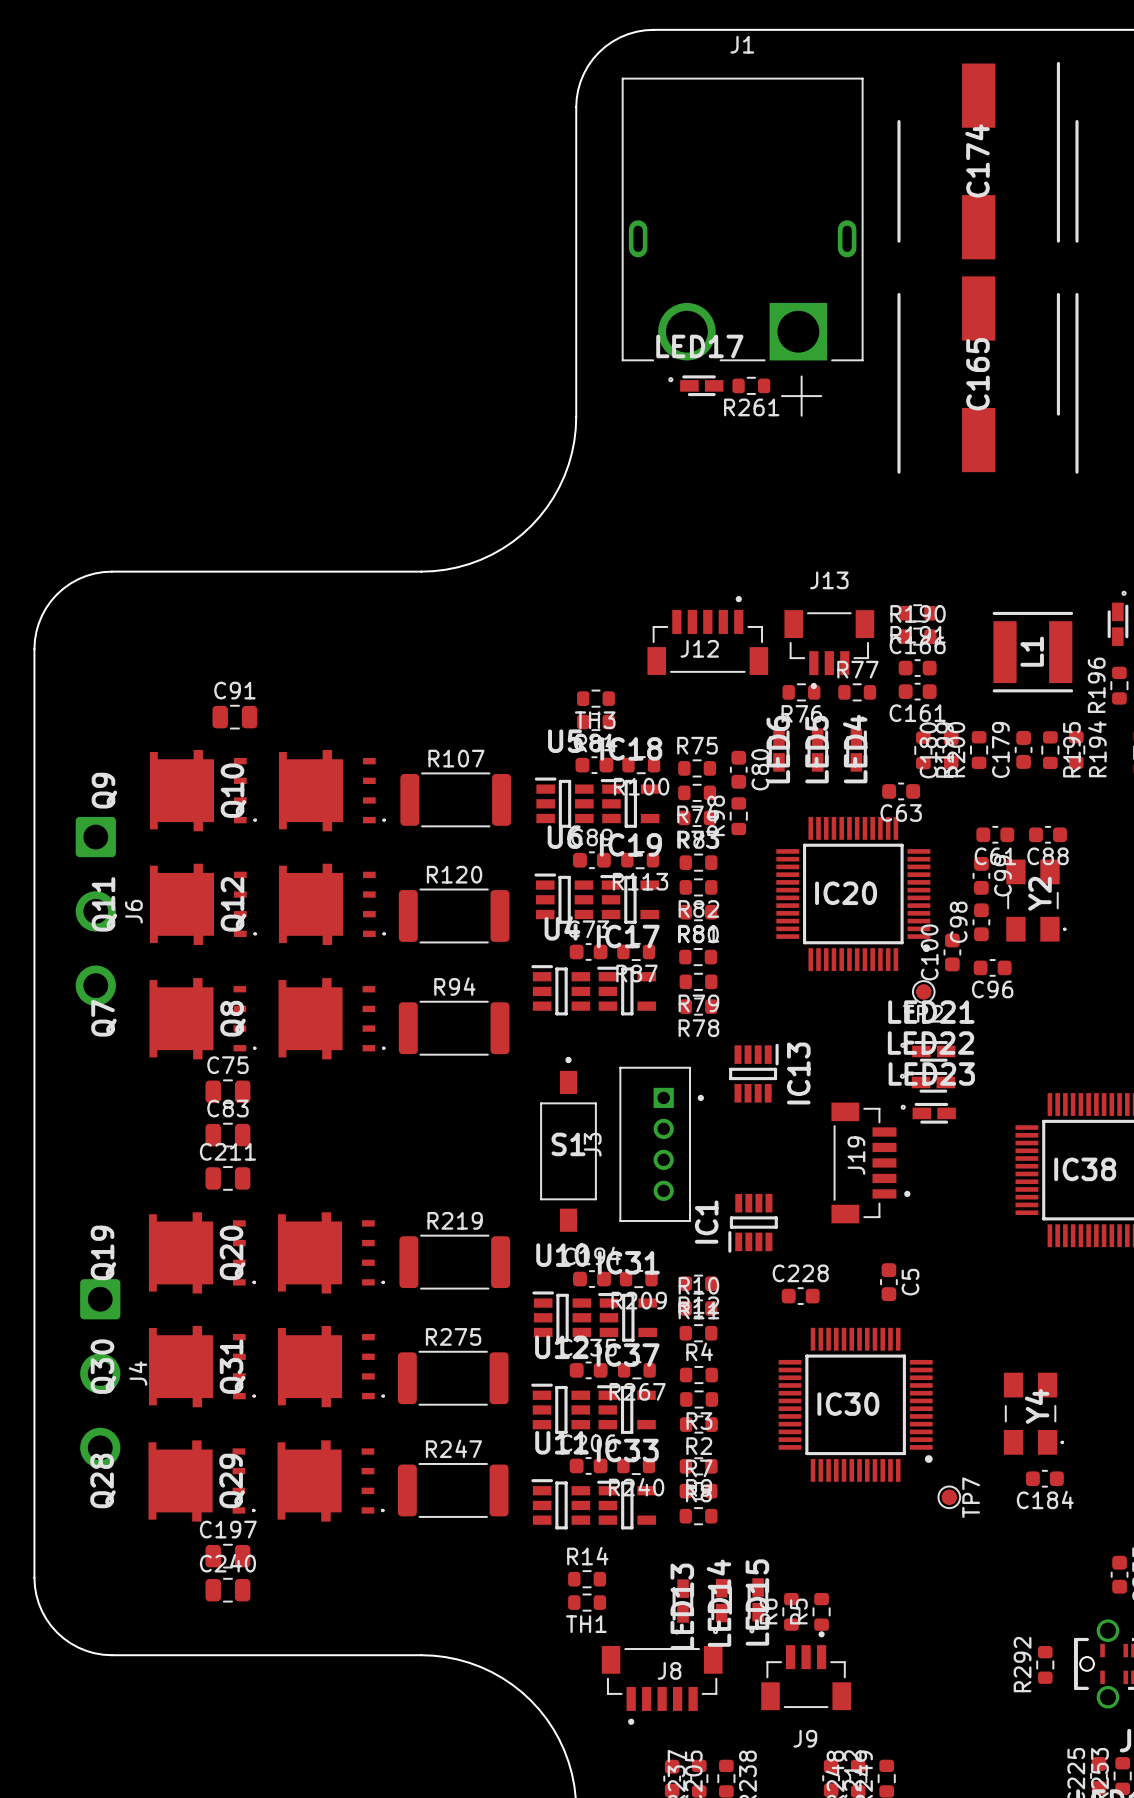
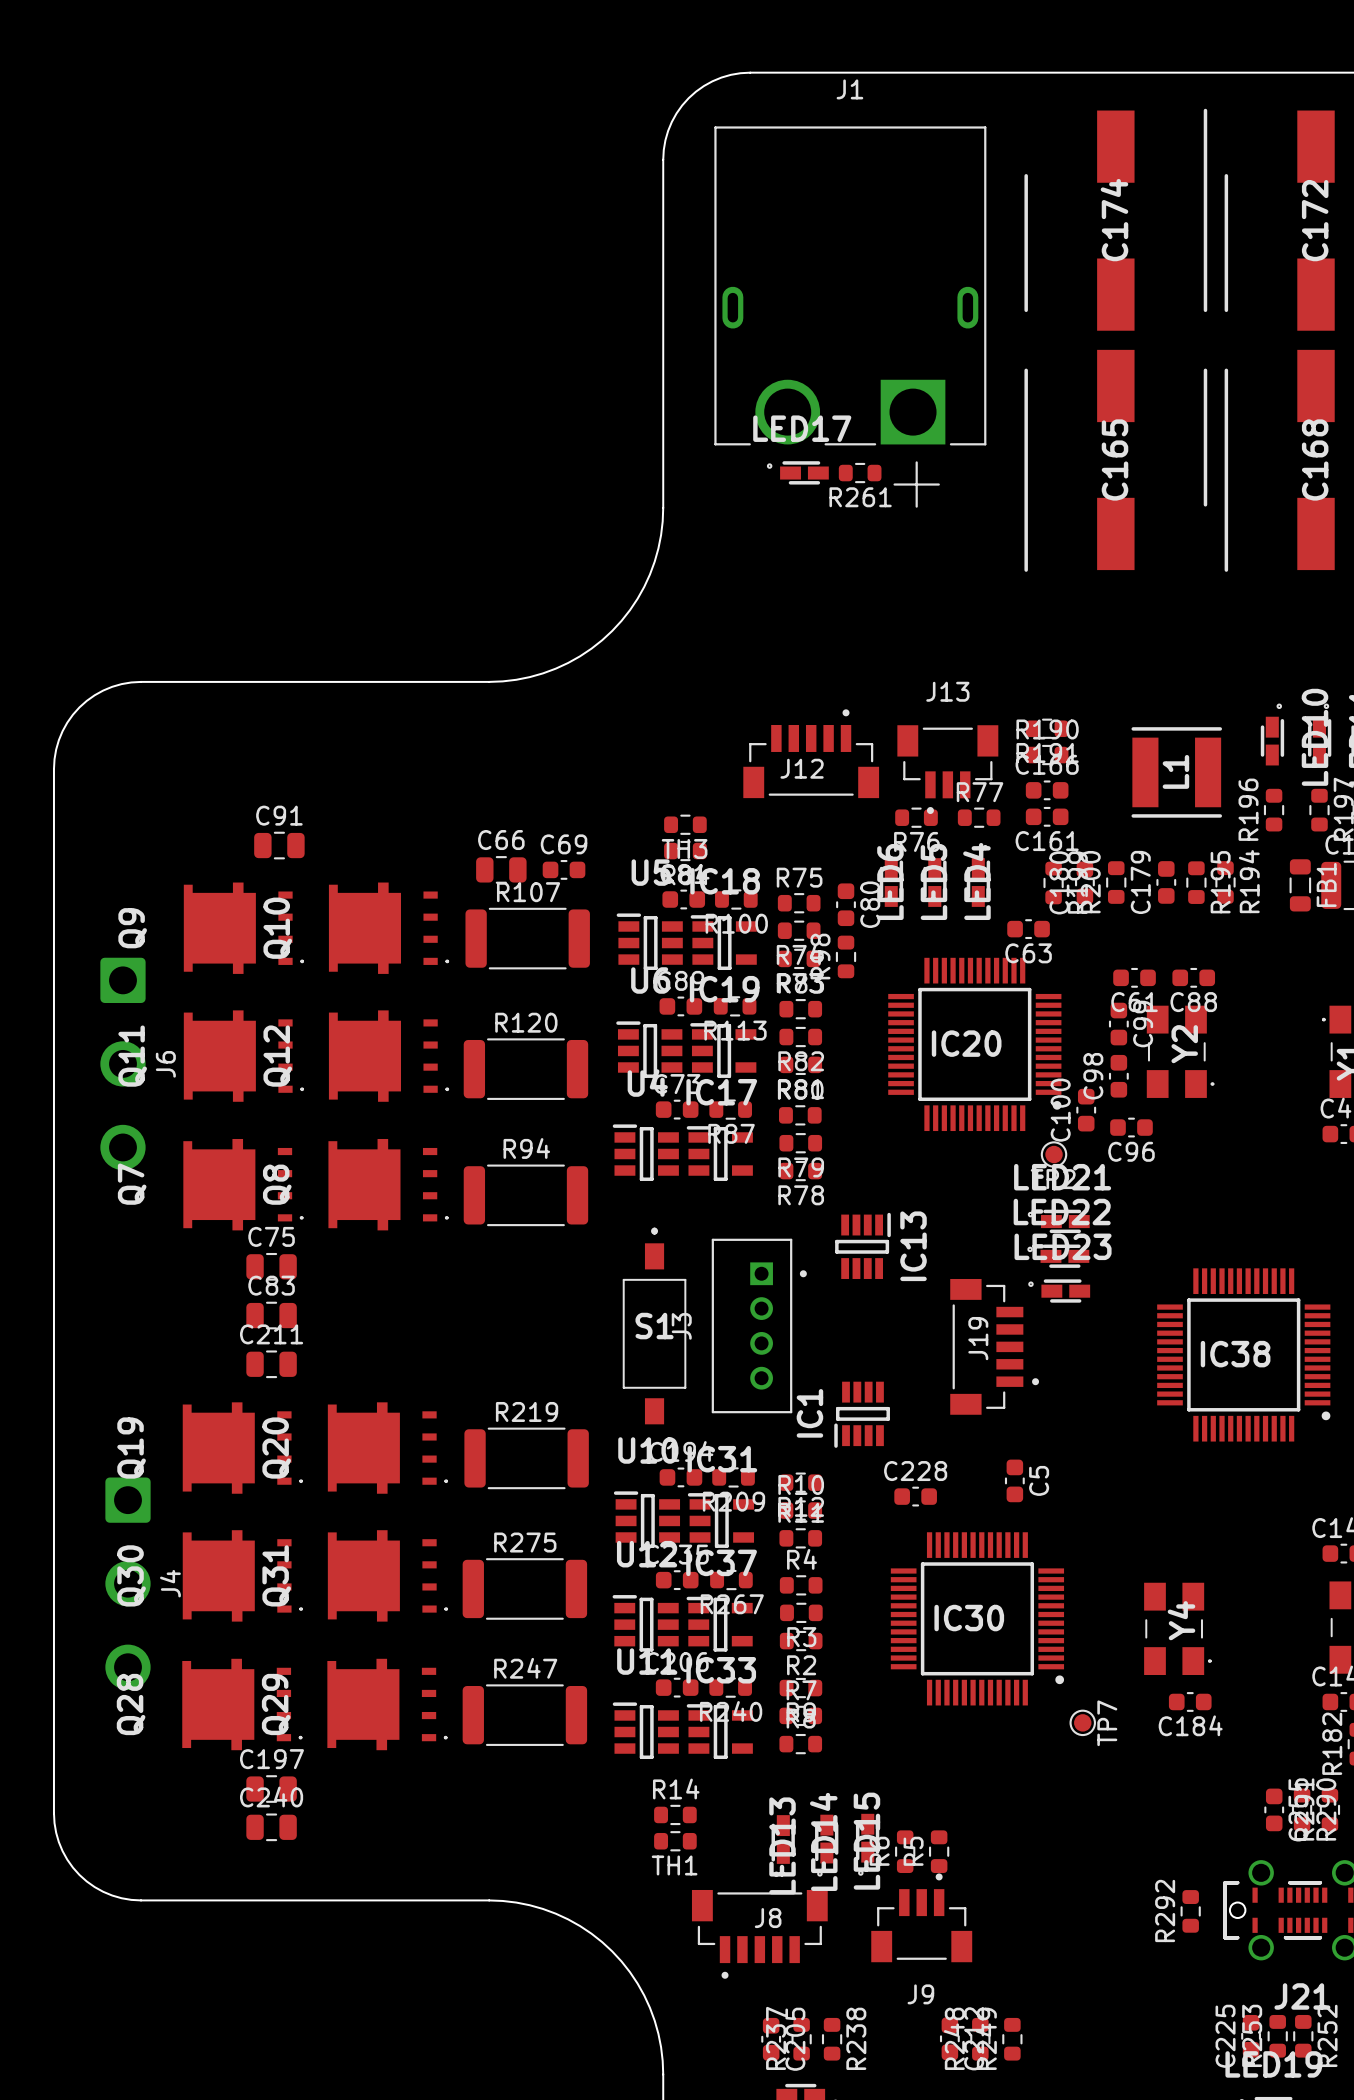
C66: none -> (501, 869)
C69: none -> (564, 869)

